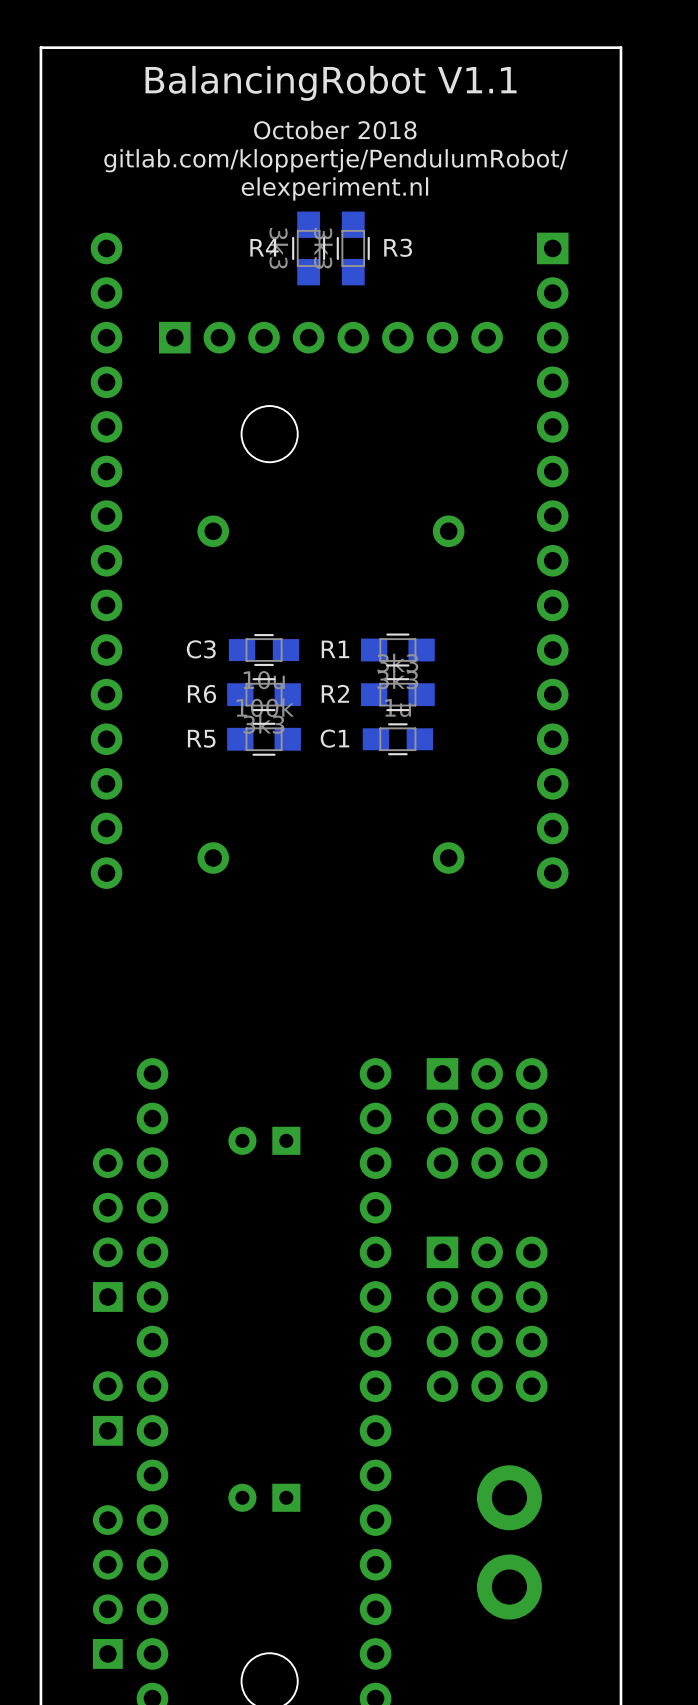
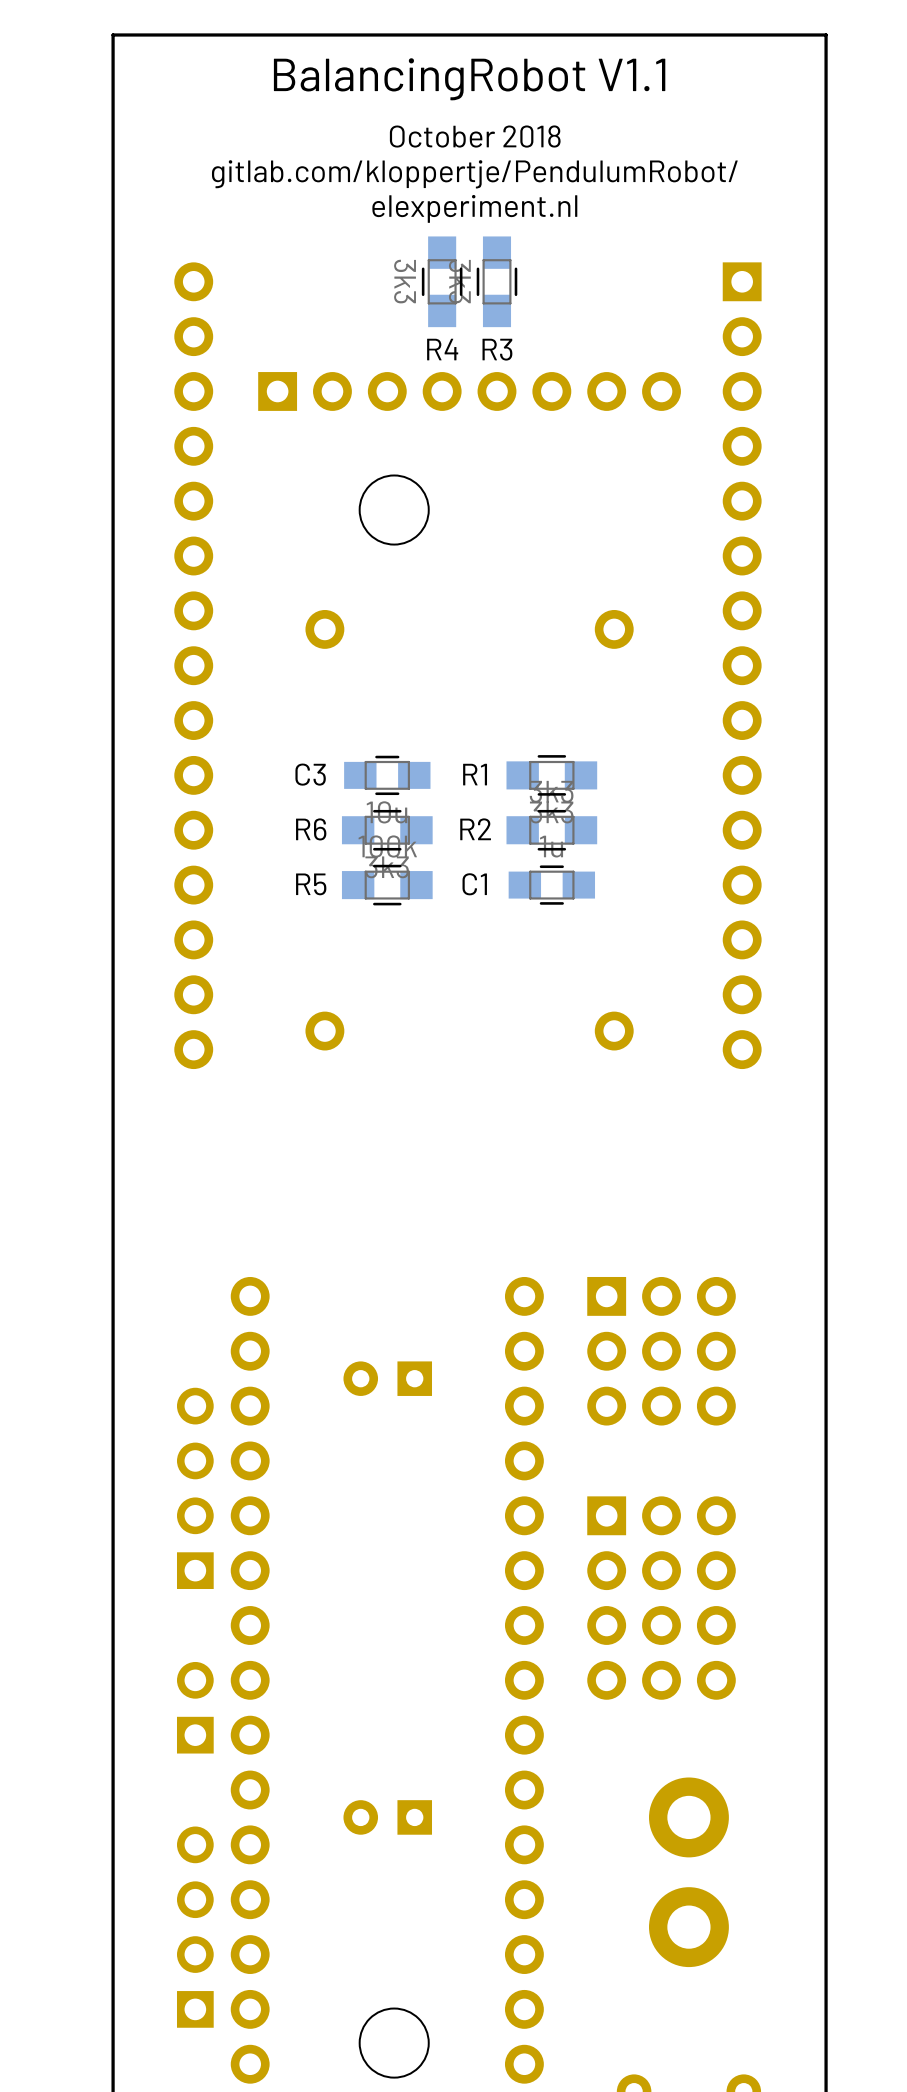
R4 name position: R4 (264, 247) -> R4 (442, 349)
R3 name position: R3 (398, 247) -> R3 (497, 349)

